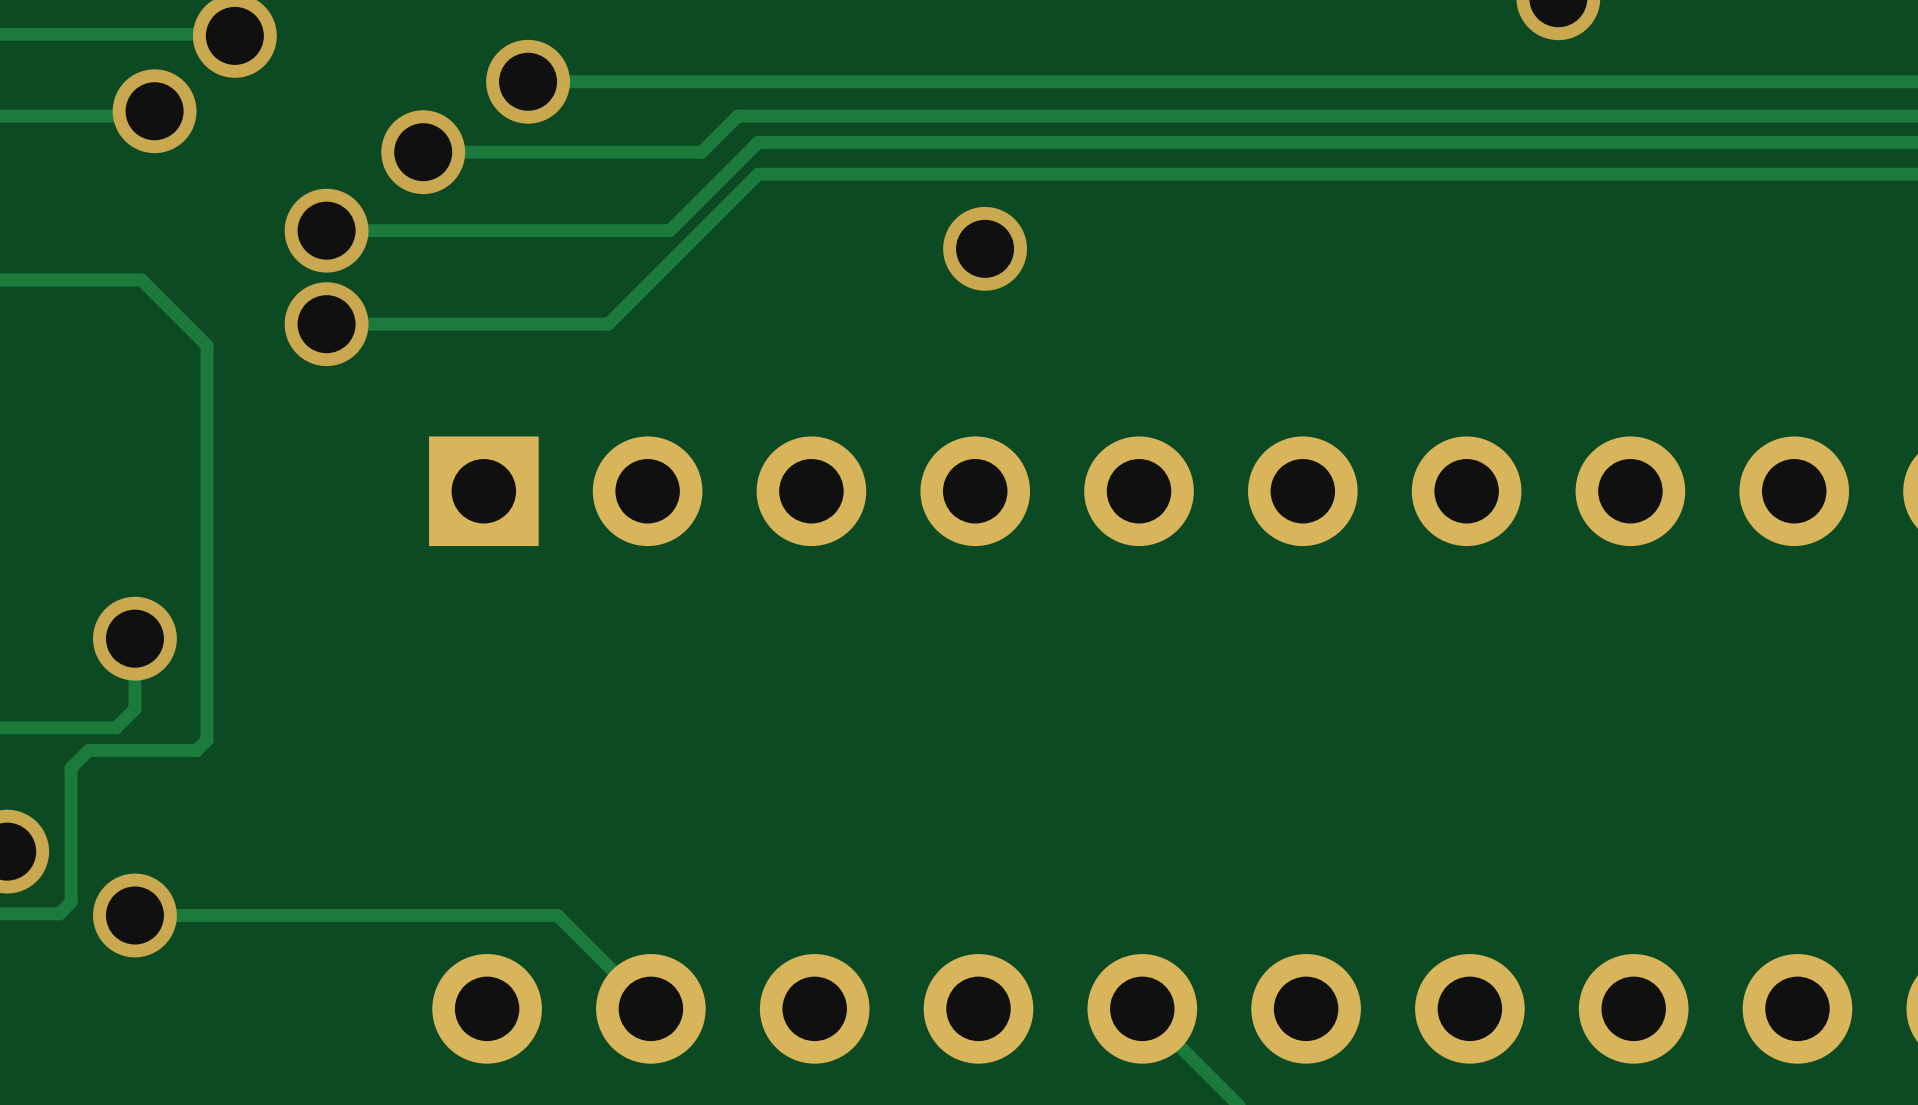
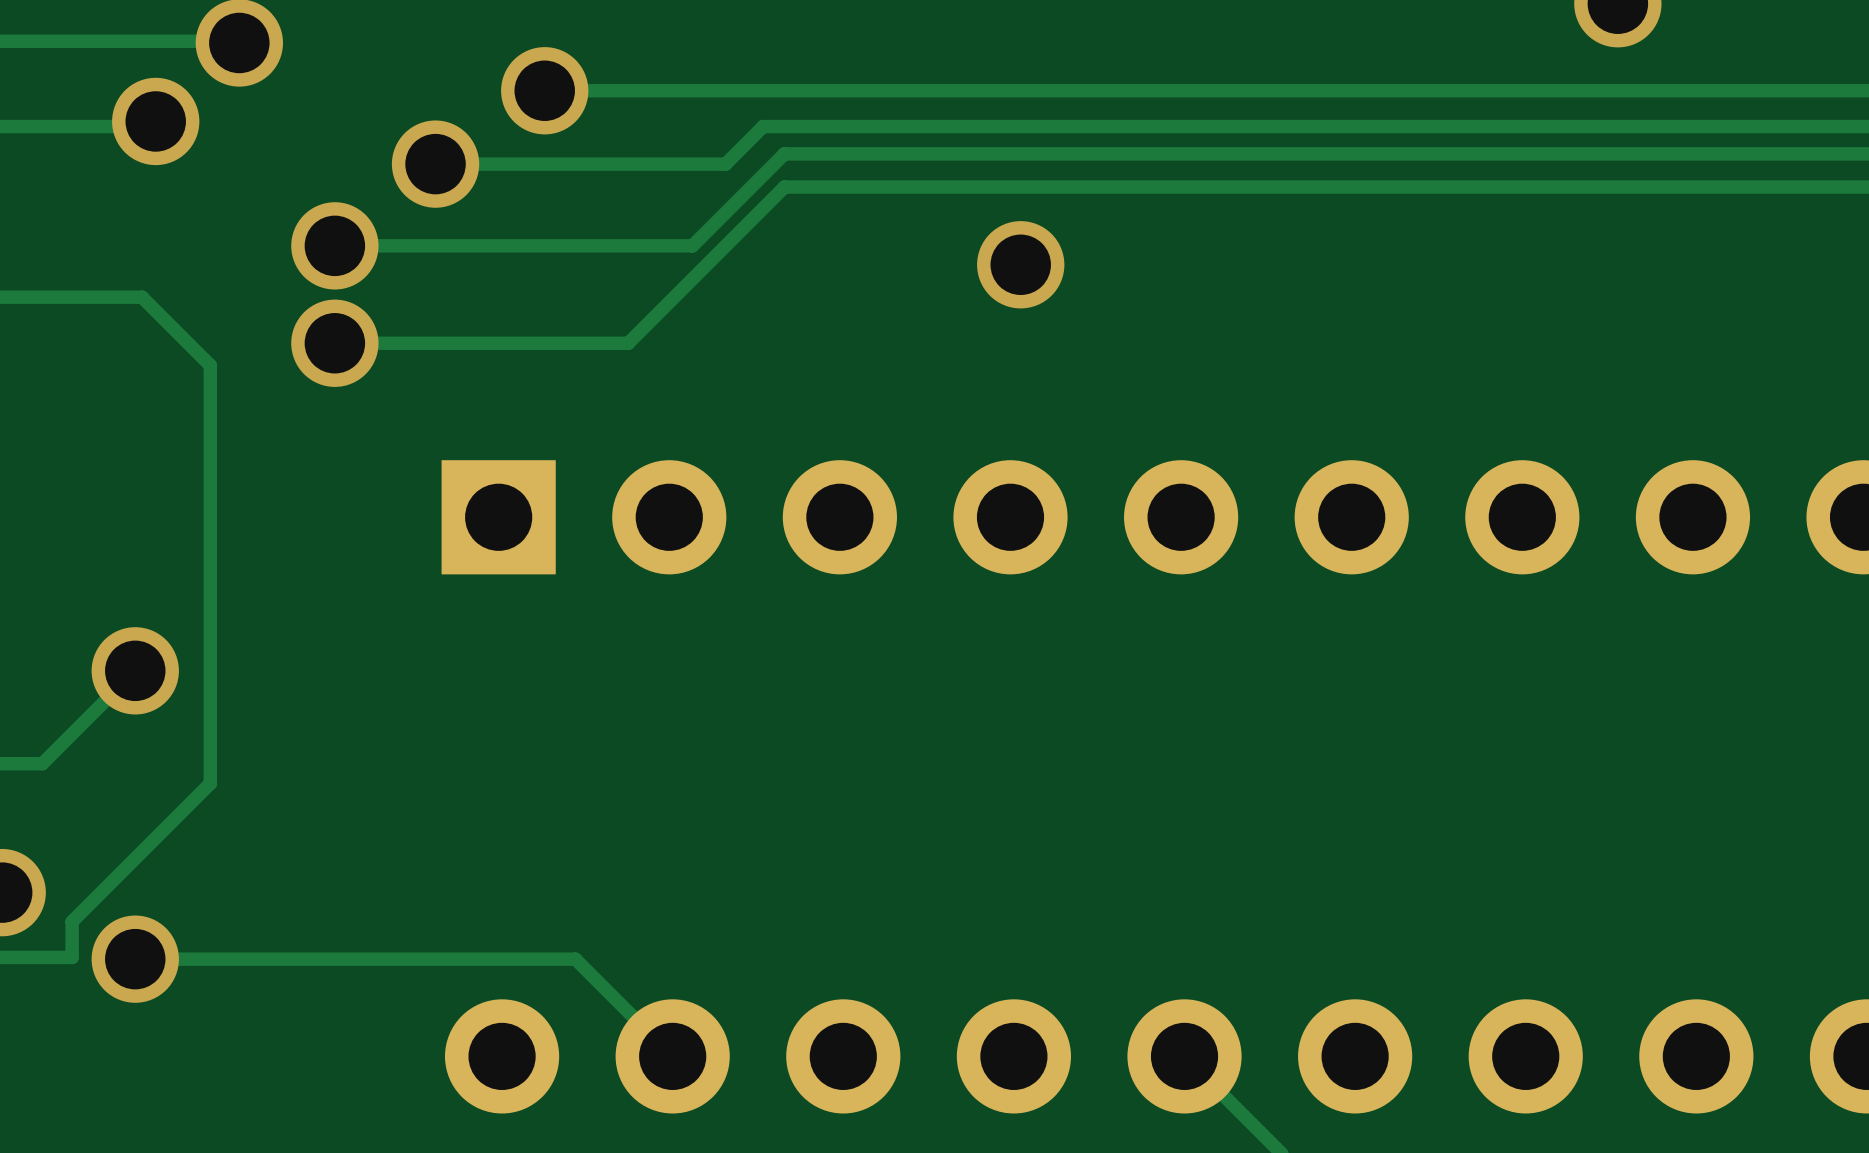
track: (134, 638) (134, 709) (116, 727) (45, 727) -> (135, 670) (42, 763)
track: (207, 740) (196, 750) (88, 750) (71, 768) (71, 902) (59, 913) -> (210, 776) (210, 783) (72, 921) (72, 957) (56, 957)

